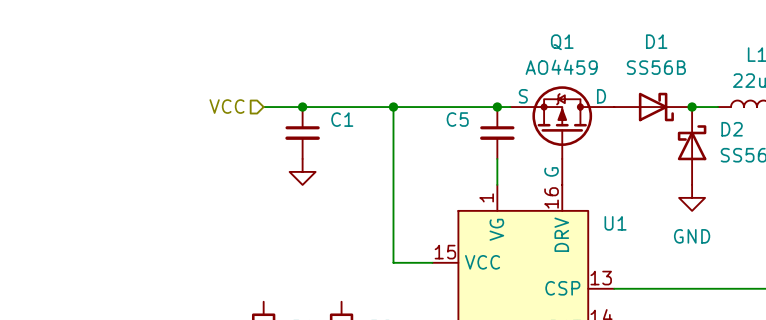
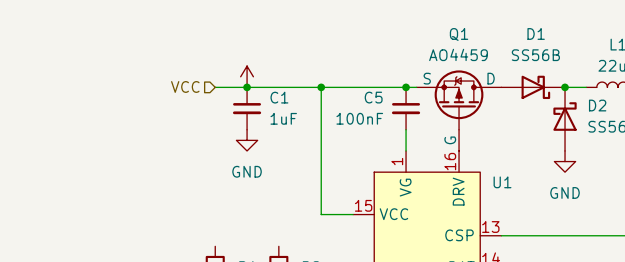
power symbol: none -> (247, 76)
C1 value: none -> 1uF (283, 118)
C5 value: none -> 100nF (359, 118)
power symbol text: none -> GND (247, 171)

